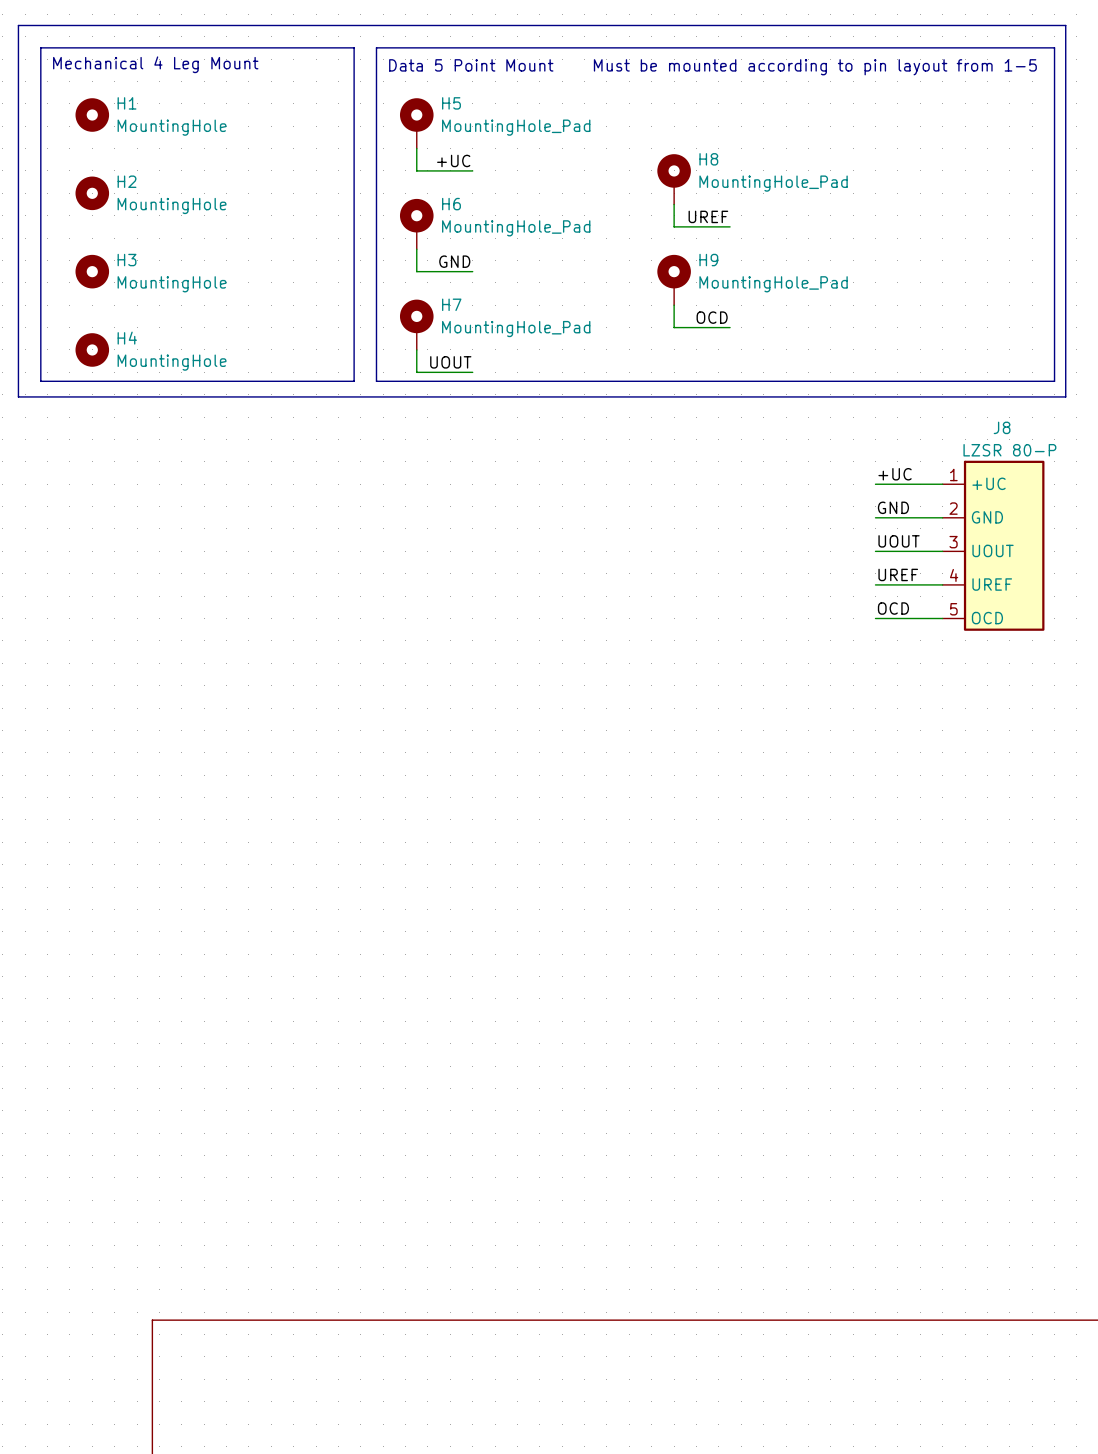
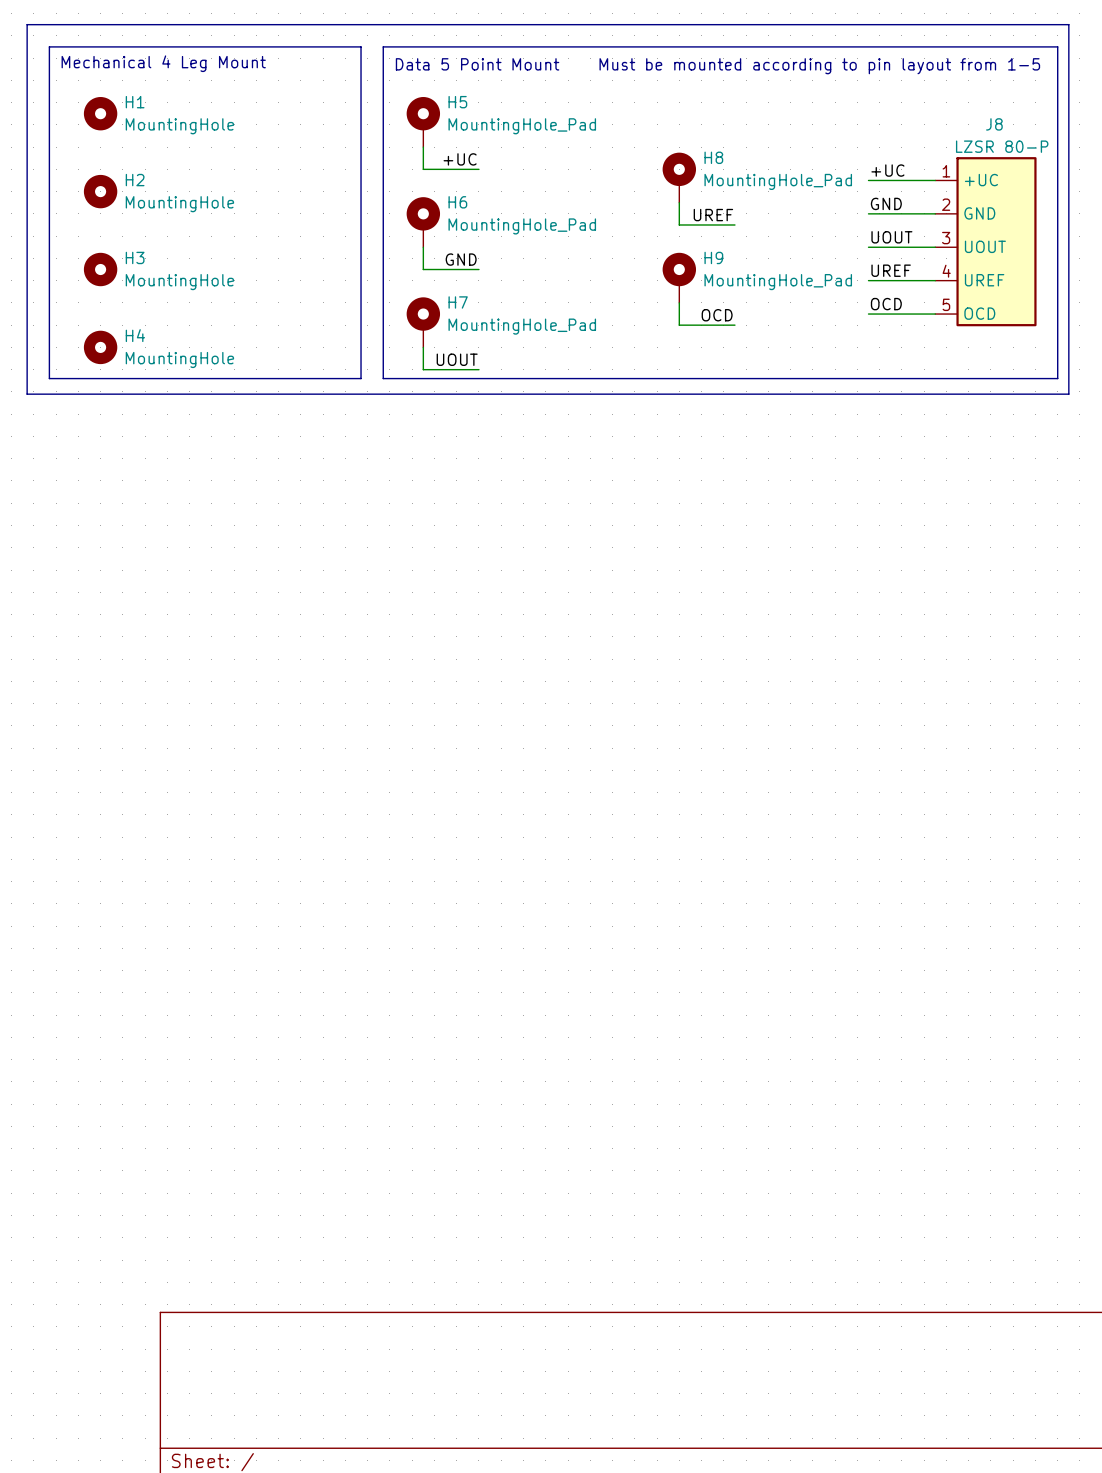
label: none -> +UC (887, 170)
wire: none -> (868, 180) (935, 180)
label: none -> GND (886, 203)
wire: none -> (868, 213) (935, 213)
label: none -> UOUT (891, 237)
wire: none -> (868, 247) (935, 247)
label: none -> UREF (891, 270)
label: none -> OCD (886, 304)
label: +UC (895, 474) -> none
wire: (875, 484) (942, 484) -> (868, 280) (935, 280)
label: GND (893, 507) -> none
wire: (875, 517) (942, 517) -> (868, 314) (935, 314)
label: UOUT (899, 541) -> none
J8 position: (993, 545) -> (985, 241)
wire: (875, 551) (942, 551) -> none
label: UREF (898, 574) -> none
wire: (875, 584) (942, 584) -> none
label: OCD (893, 608) -> none
wire: (875, 618) (942, 618) -> none

